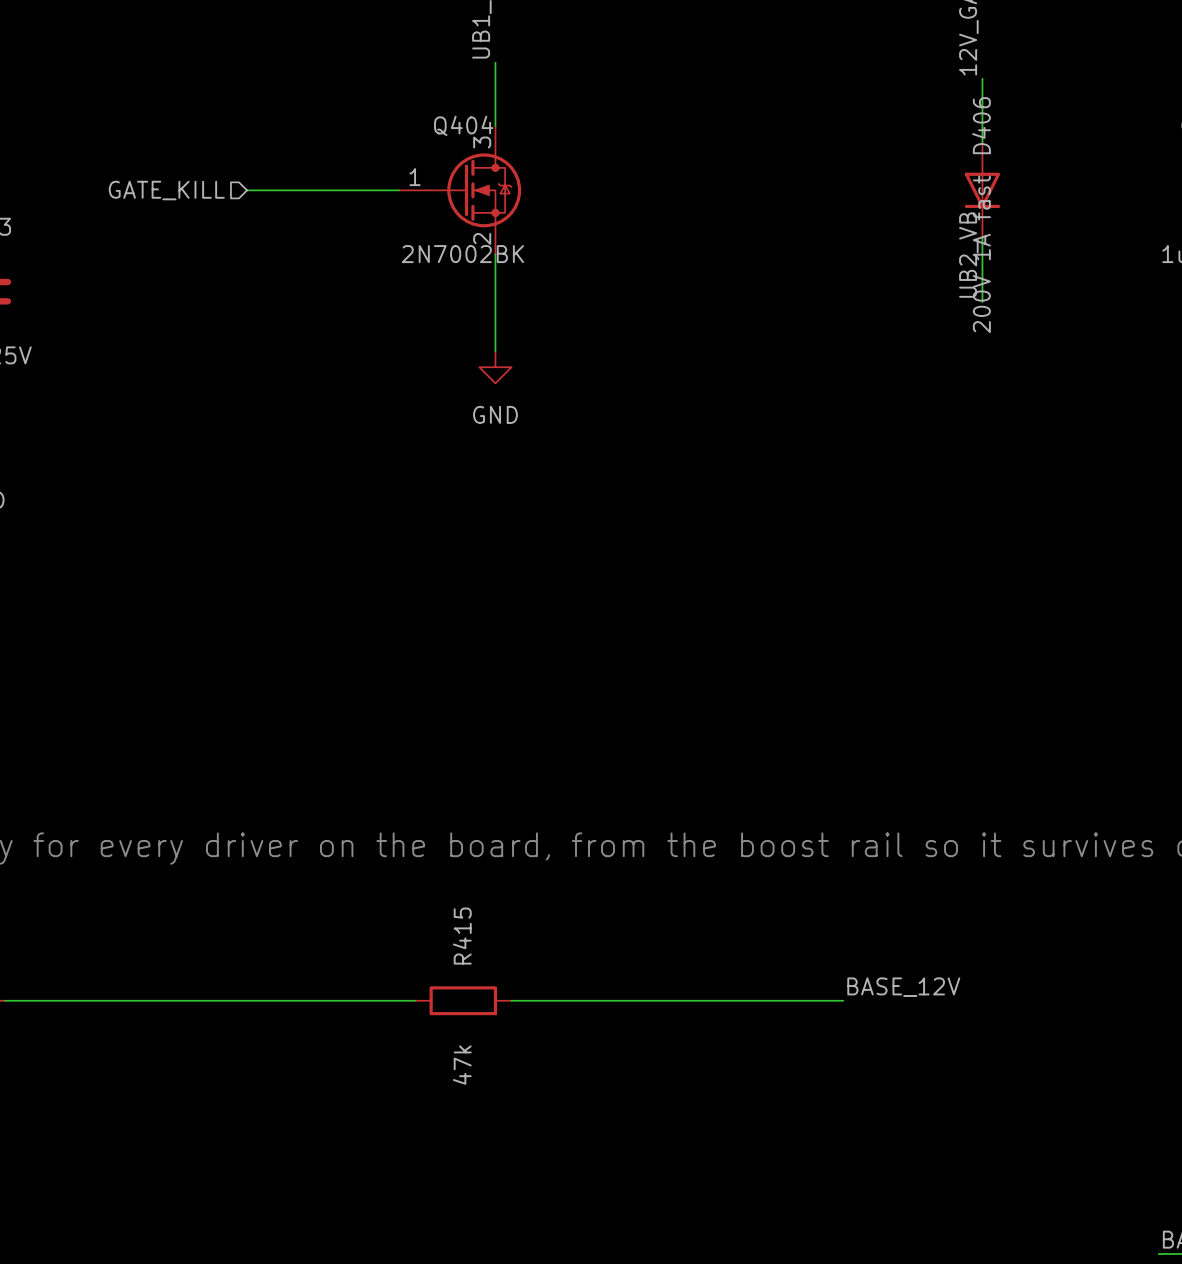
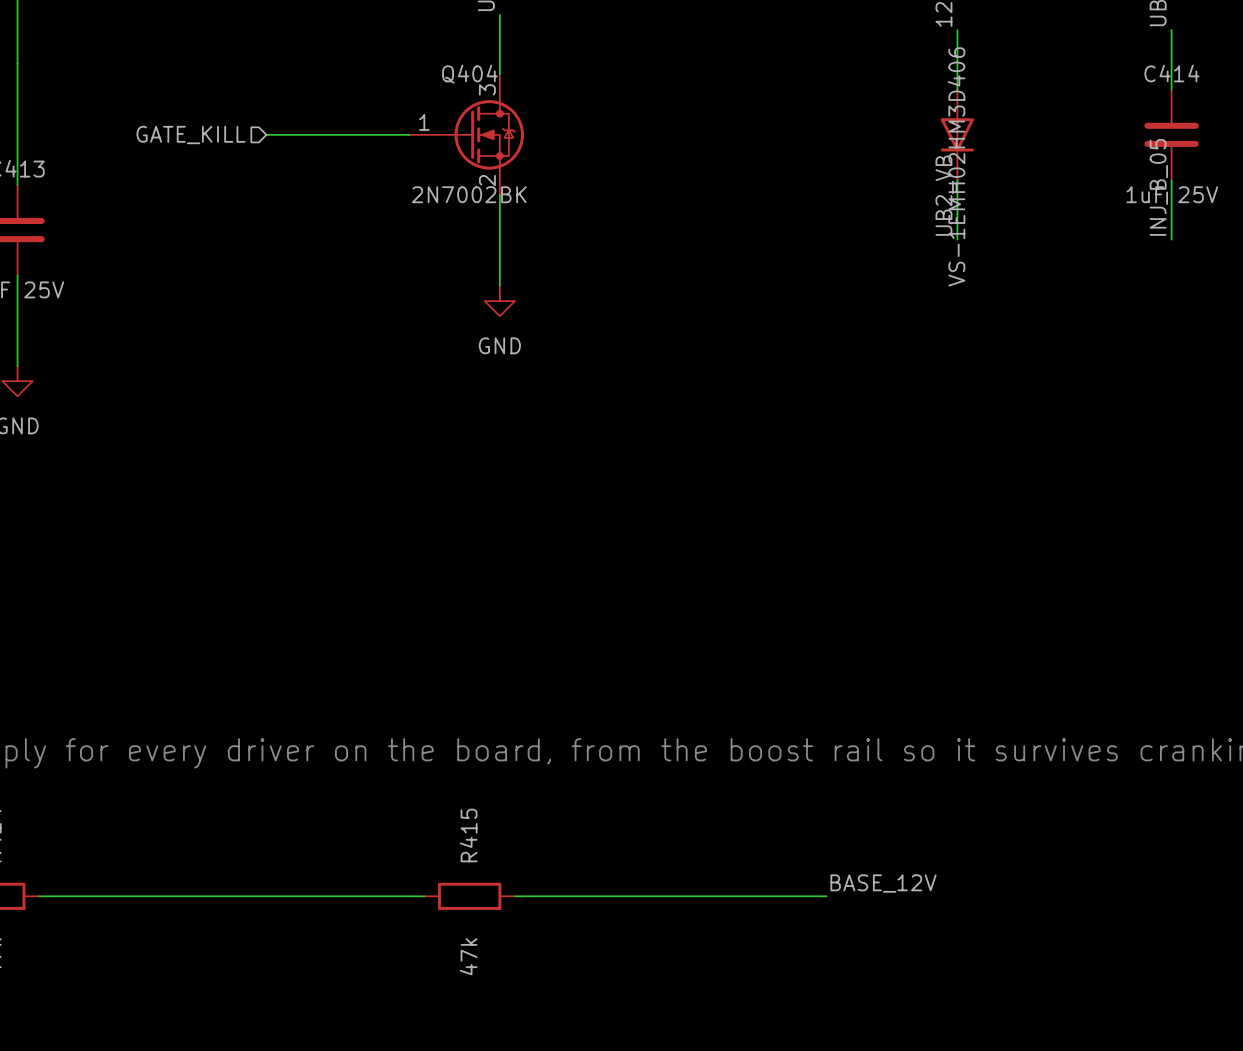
D406 value: 200V 1A fast (981, 254) -> VS-1EMH02HM3 (956, 196)

